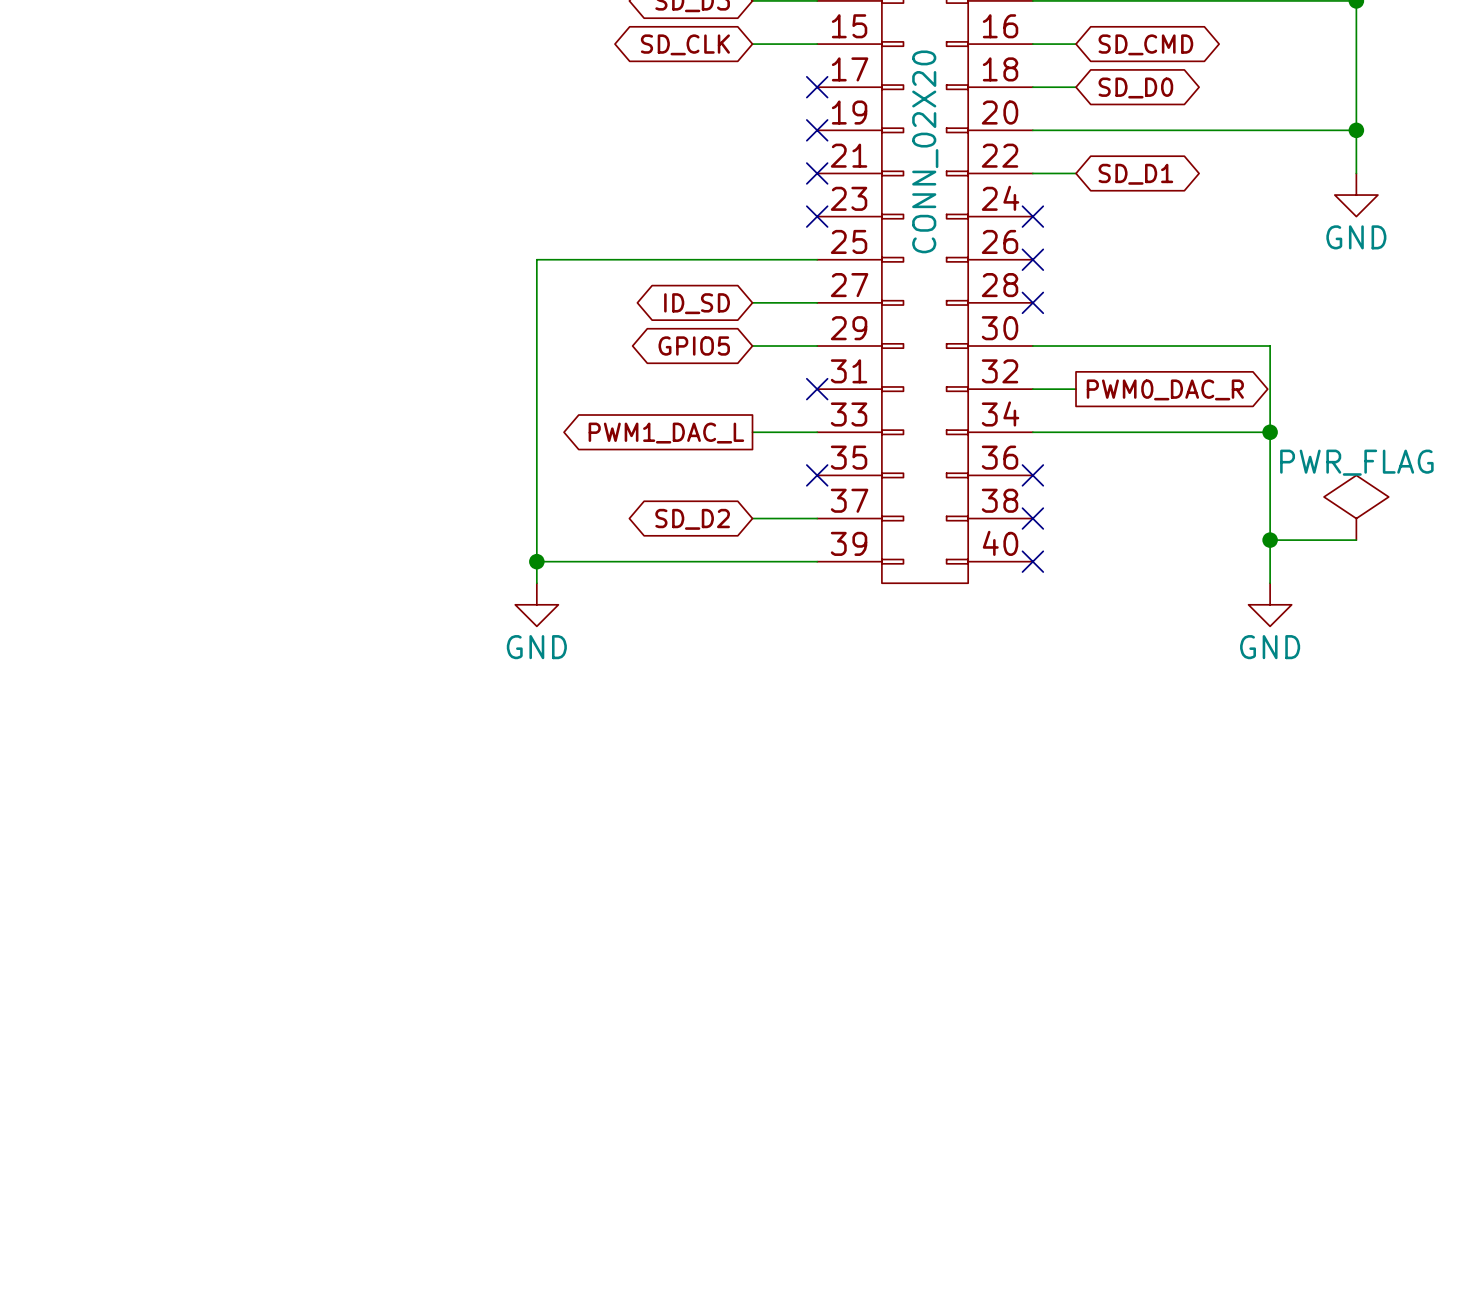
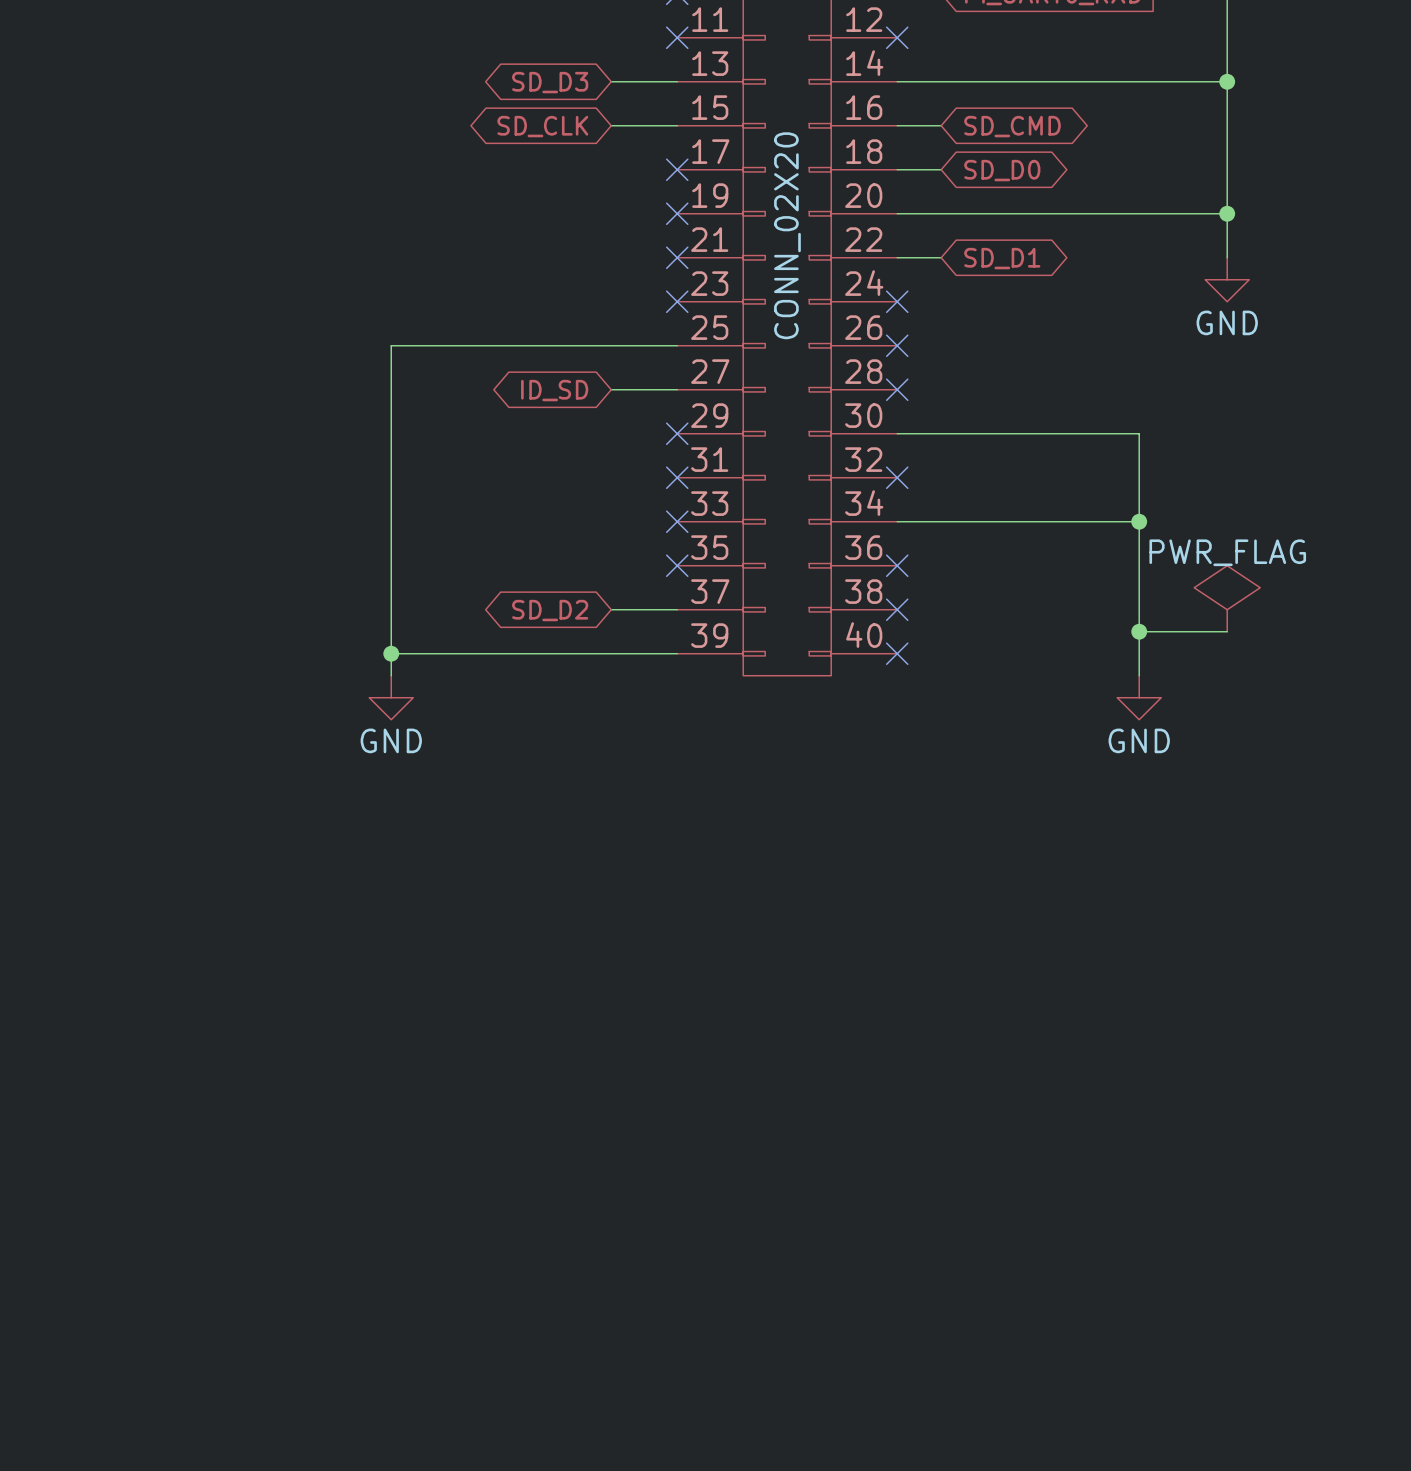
global label: GPIO5 (694, 346) -> none
wire: (752, 346) (817, 346) -> none
no-connect mark: none -> (677, 433)
wire: (1032, 389) (1076, 389) -> none
no-connect mark: none -> (897, 477)
global label: PWM0_DAC_R (1165, 389) -> none
wire: (752, 432) (817, 432) -> none
no-connect mark: none -> (677, 521)
global label: PWM1_DAC_L (666, 433) -> none

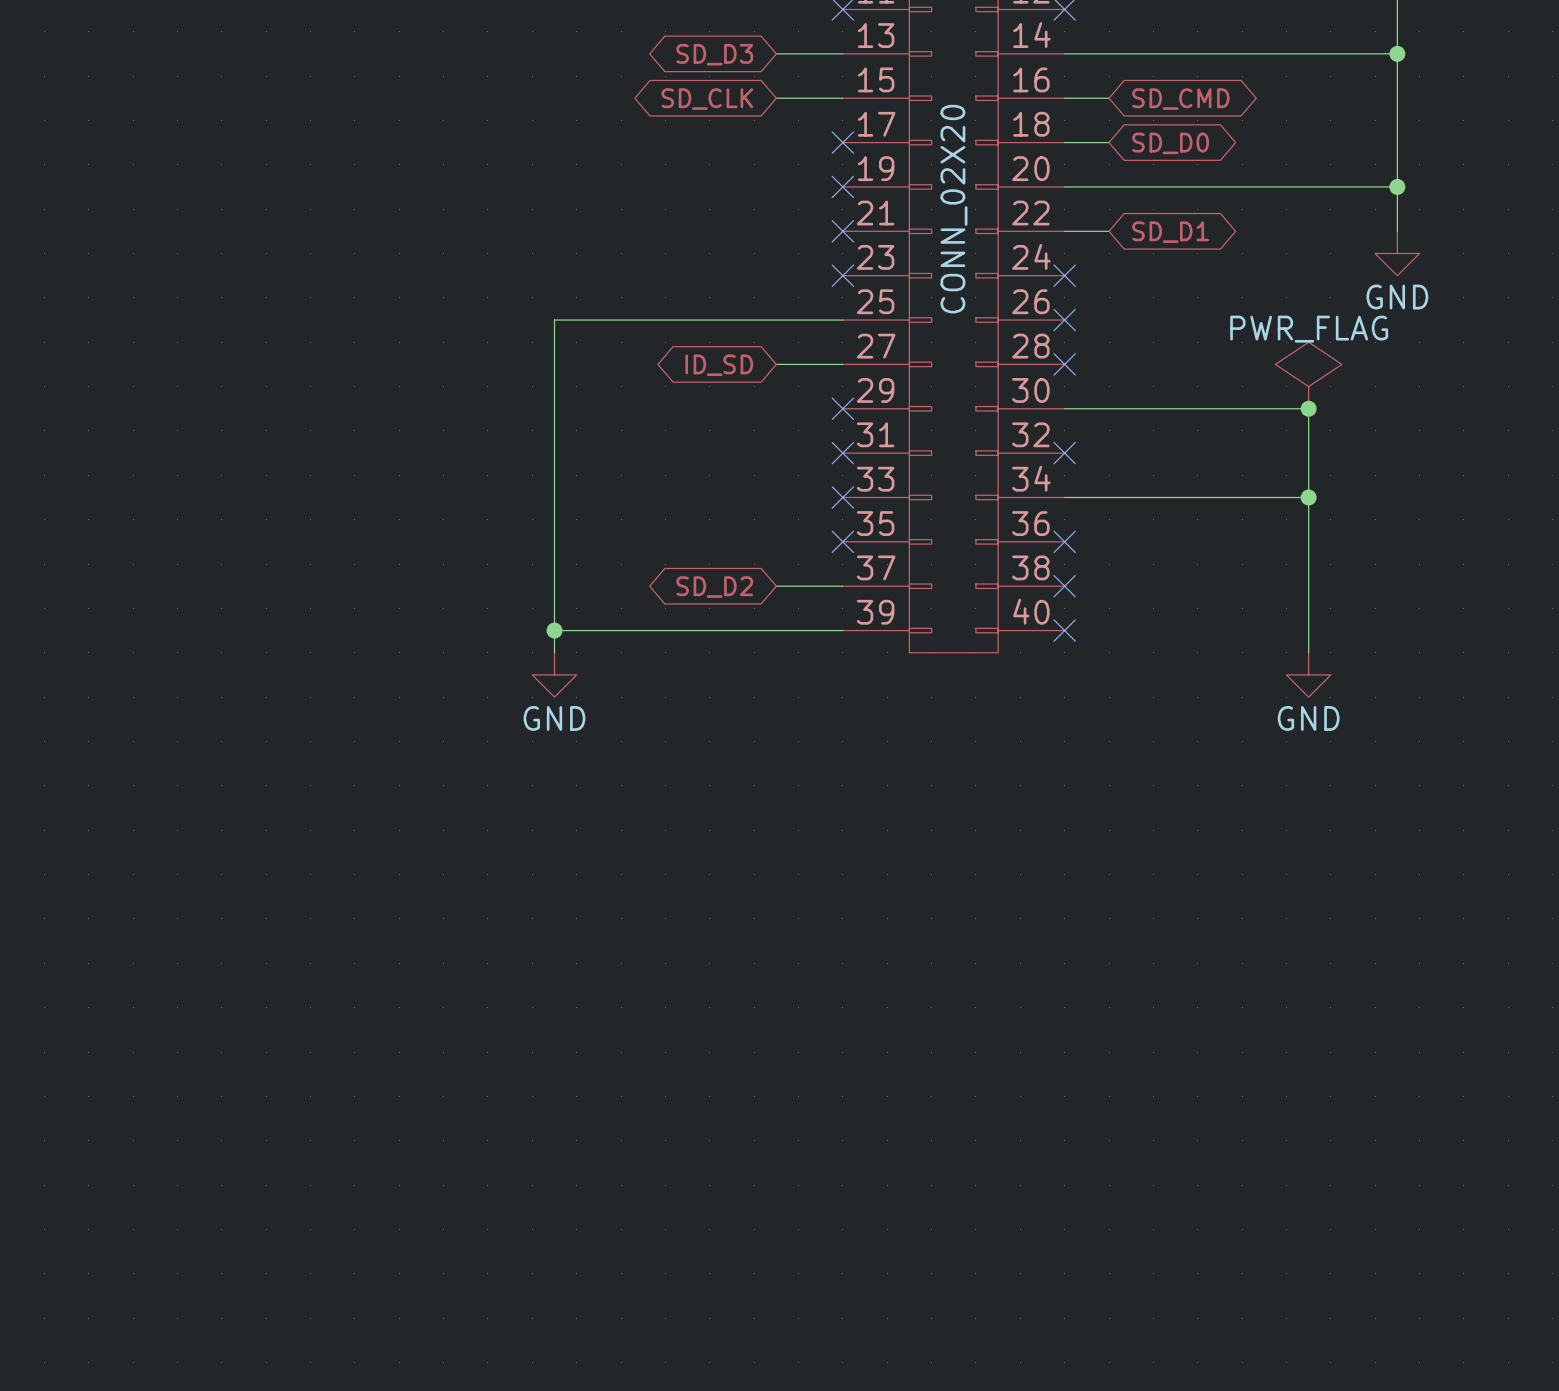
junction: none -> (1308, 408)
power symbol position: PWR_FLAG (1227, 598) -> PWR_FLAG (1308, 375)
wire: (1139, 631) (1227, 631) -> none
junction: (1139, 631) -> none

